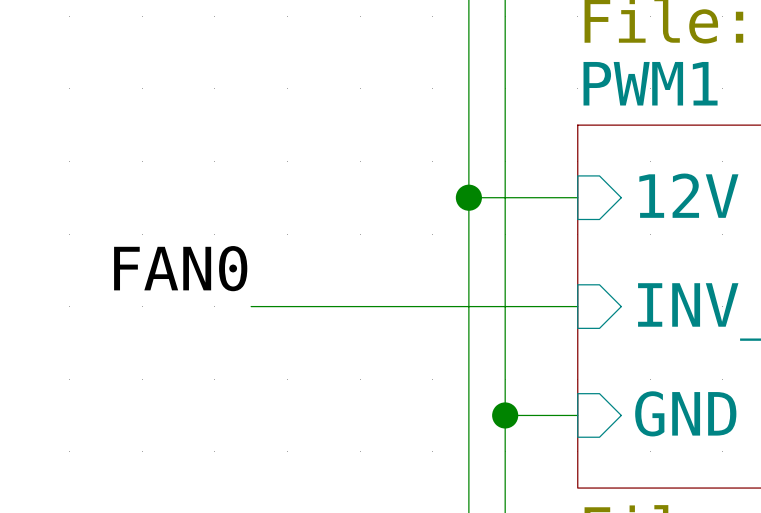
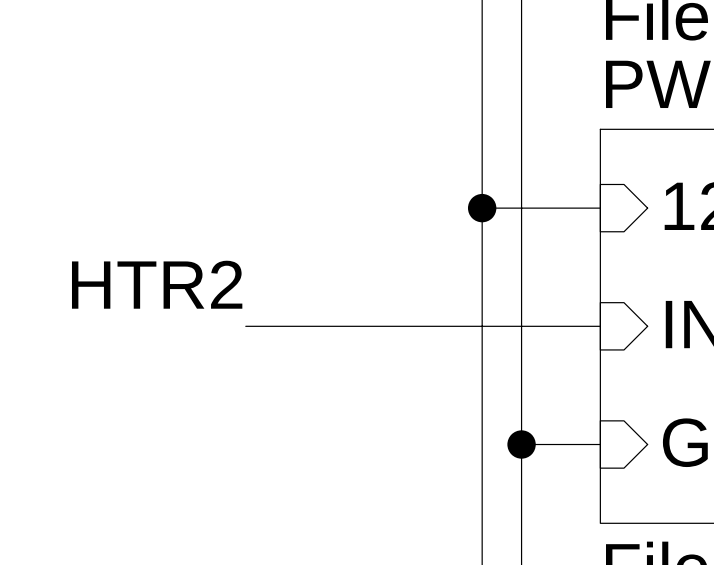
label: FAN0 (180, 268) -> HTR2 (157, 284)

